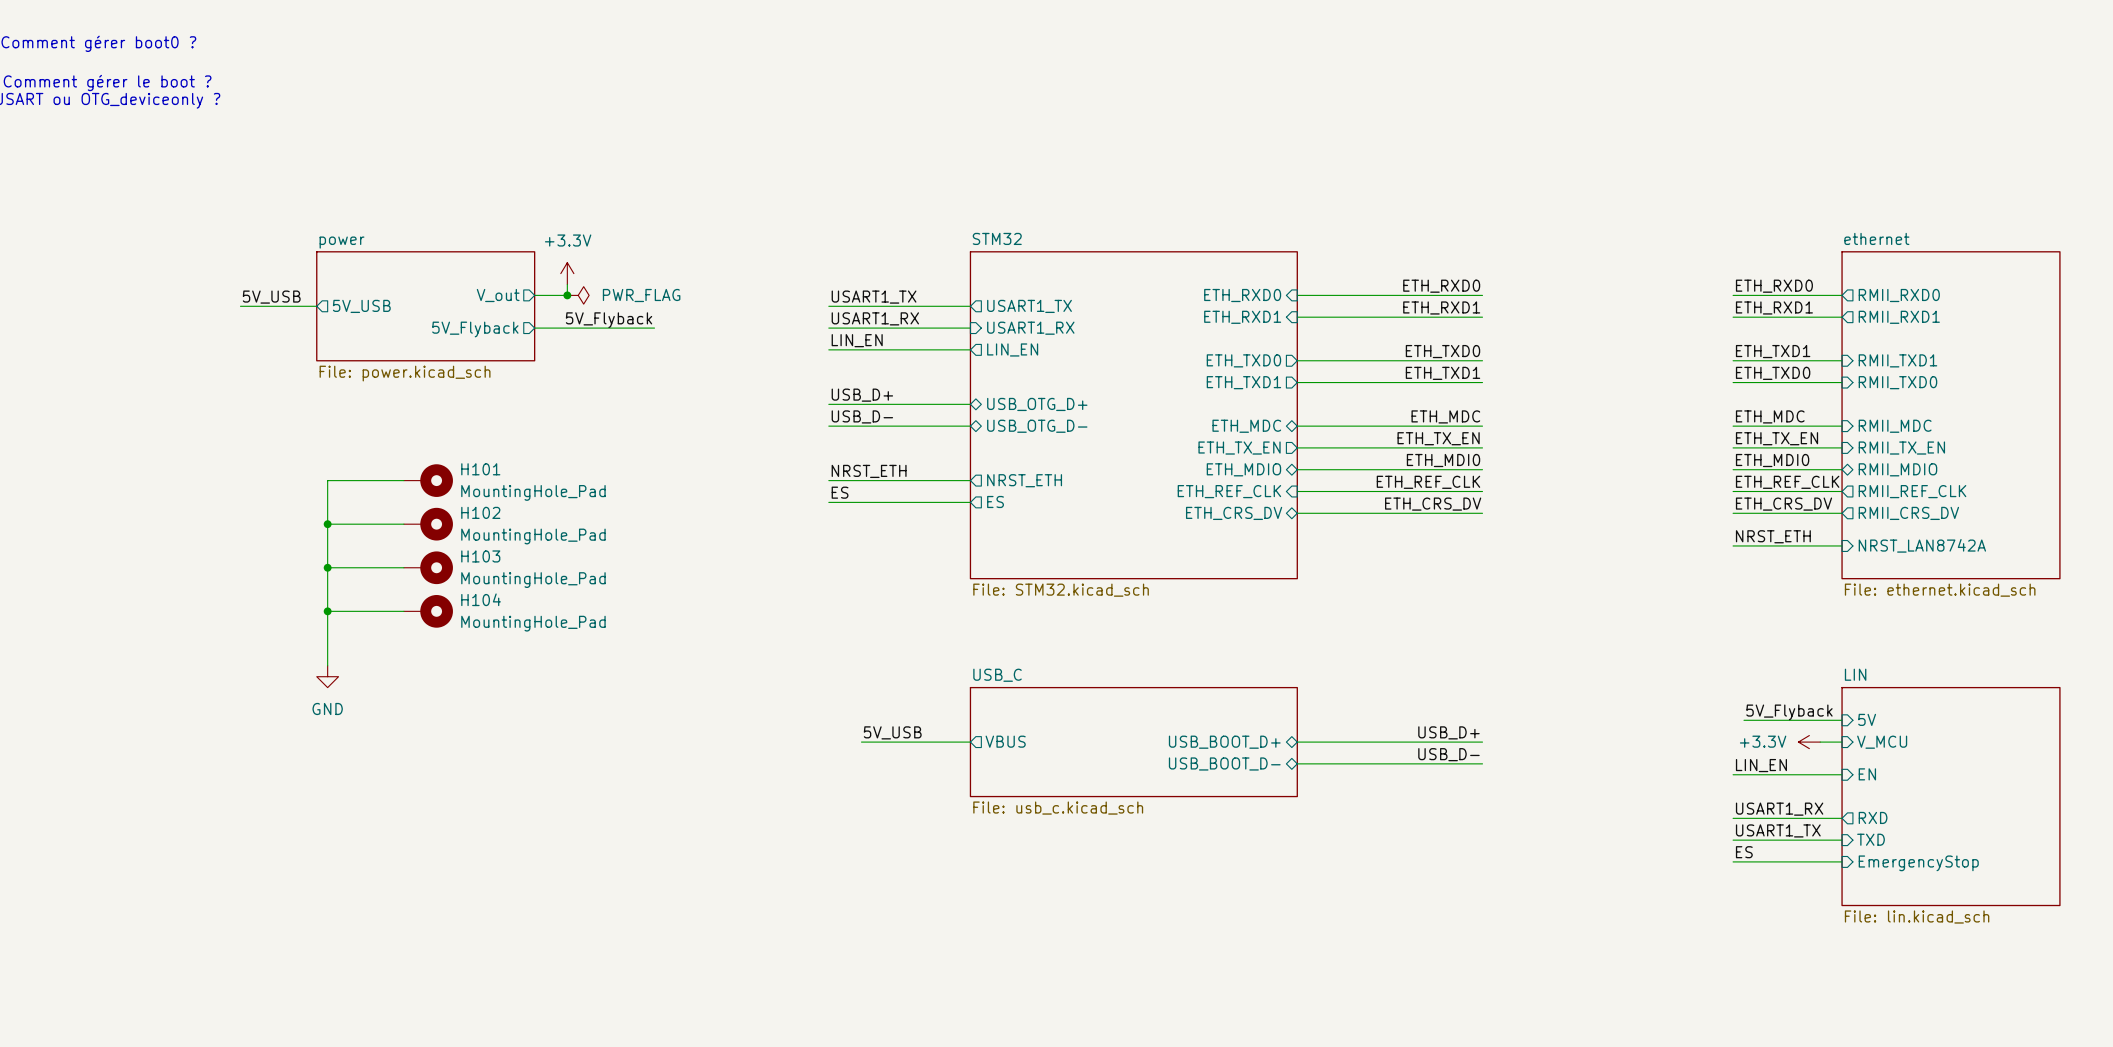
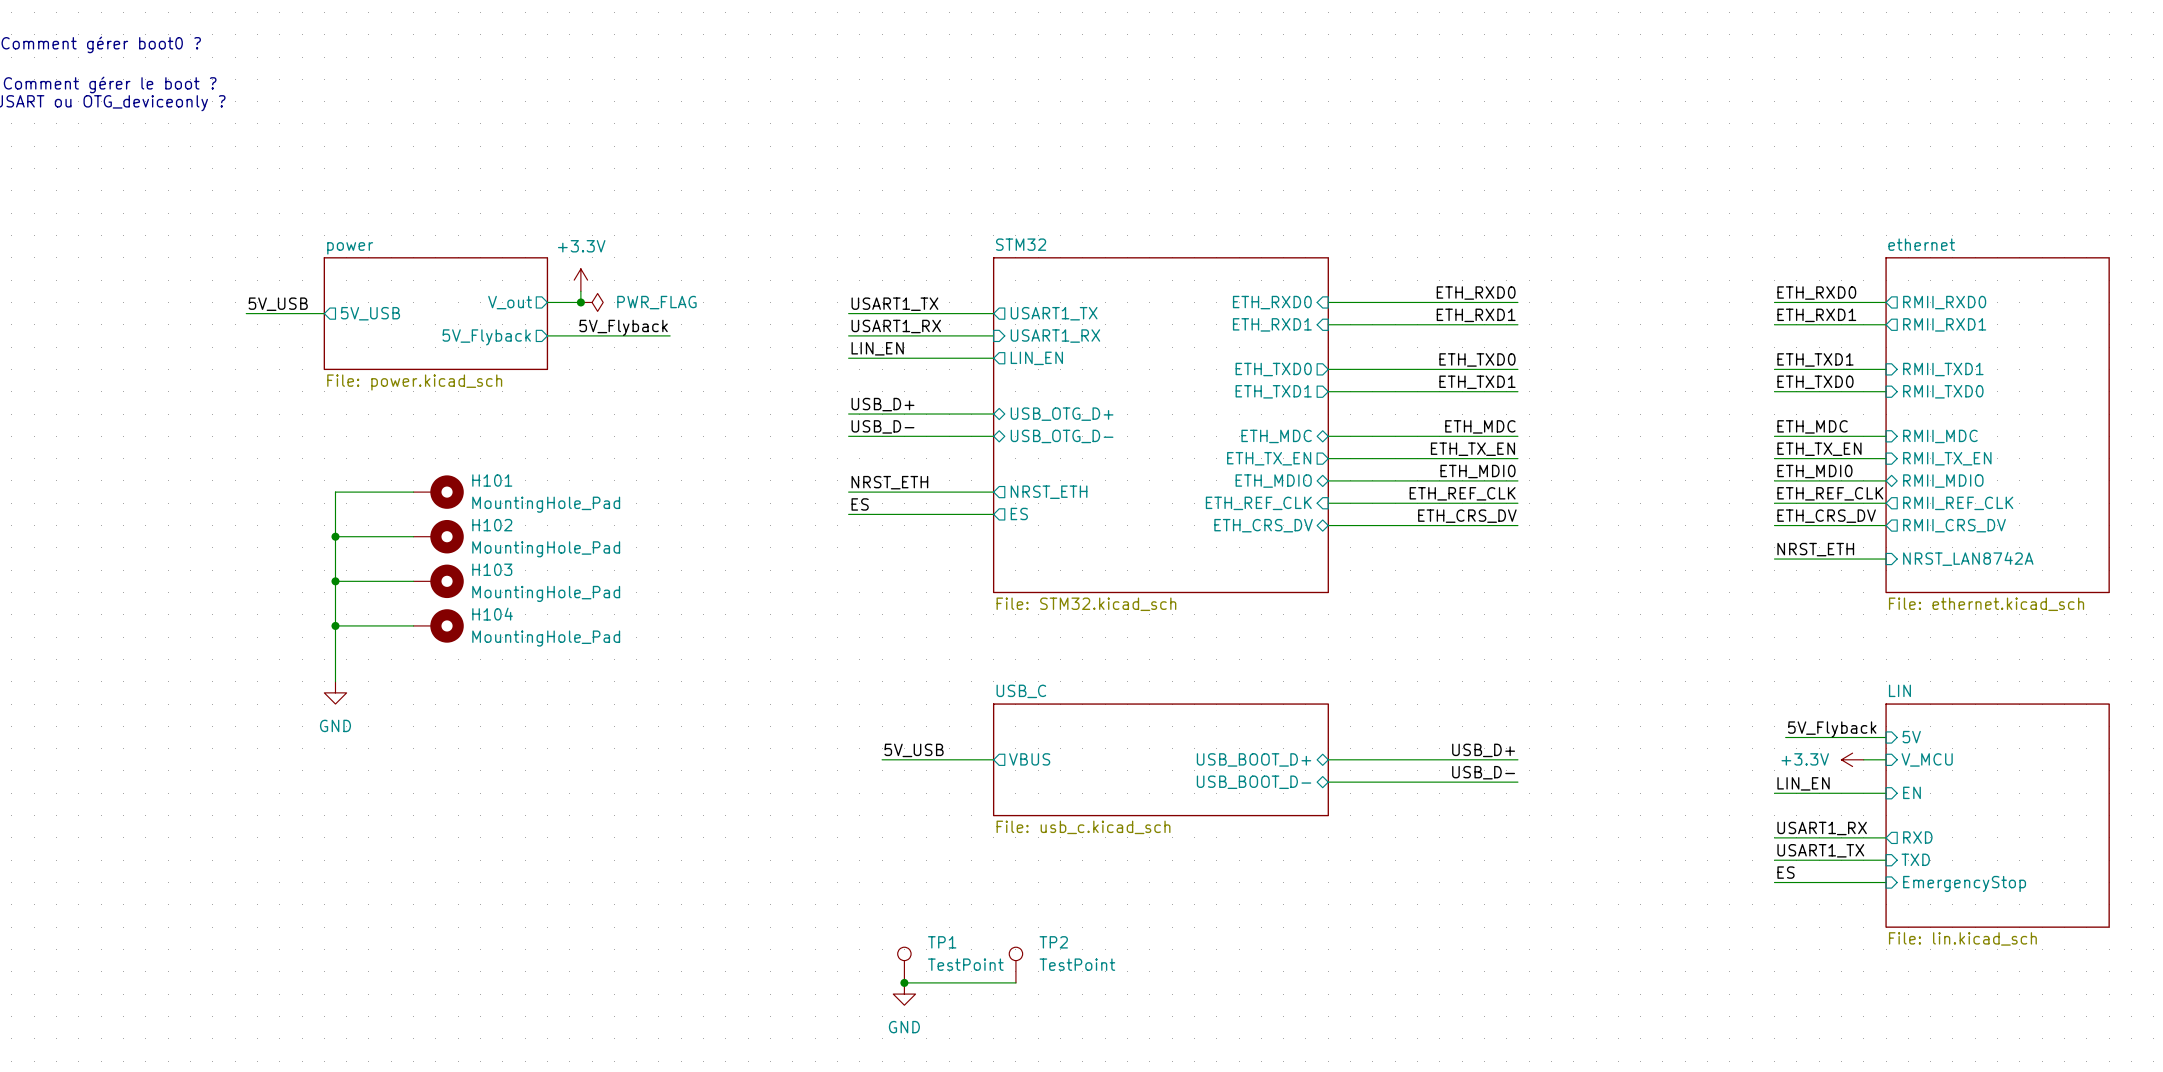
TP1: none -> TestPoint (904, 965)
TP2: none -> TestPoint (1015, 965)
wire: none -> (904, 982) (1015, 982)
junction: none -> (904, 982)
power symbol: none -> GND (904, 994)

